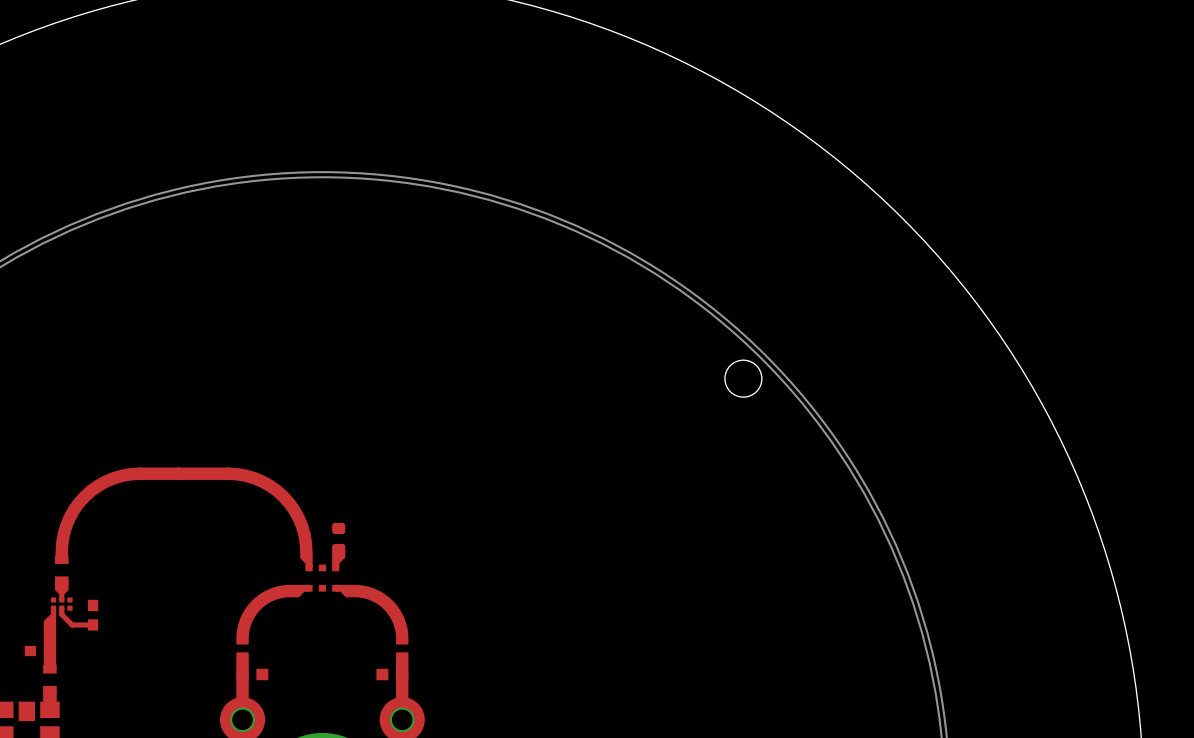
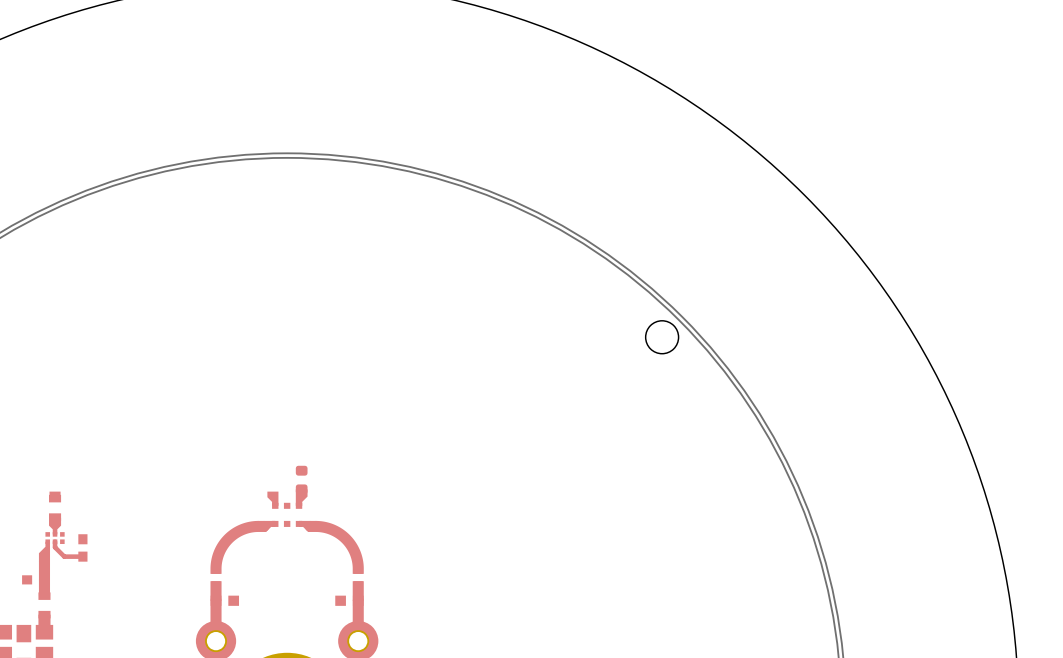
top track: (306, 551) (302, 526) (294, 510) (283, 496) (262, 481) (245, 475) (228, 473) (131, 474) (106, 481) (91, 490) (73, 510) (63, 534) (61, 551) -> none

